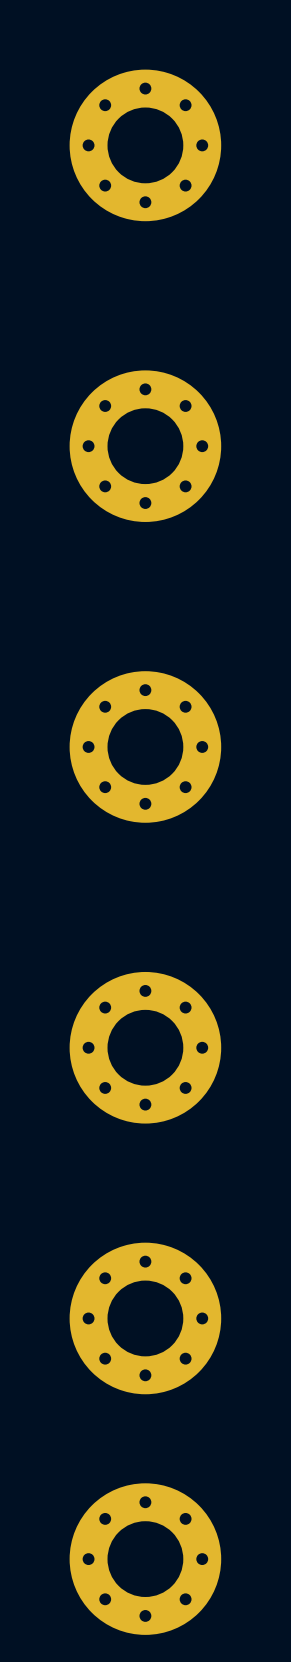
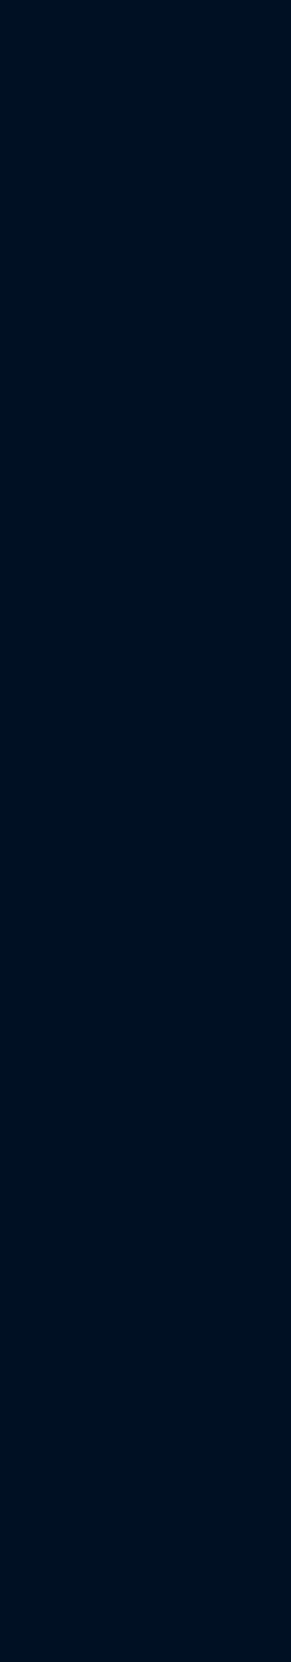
part: (145, 145) -> none
part: (145, 446) -> none
part: (145, 746) -> none
part: (145, 1047) -> none
part: (145, 1318) -> none
part: (145, 1559) -> none

